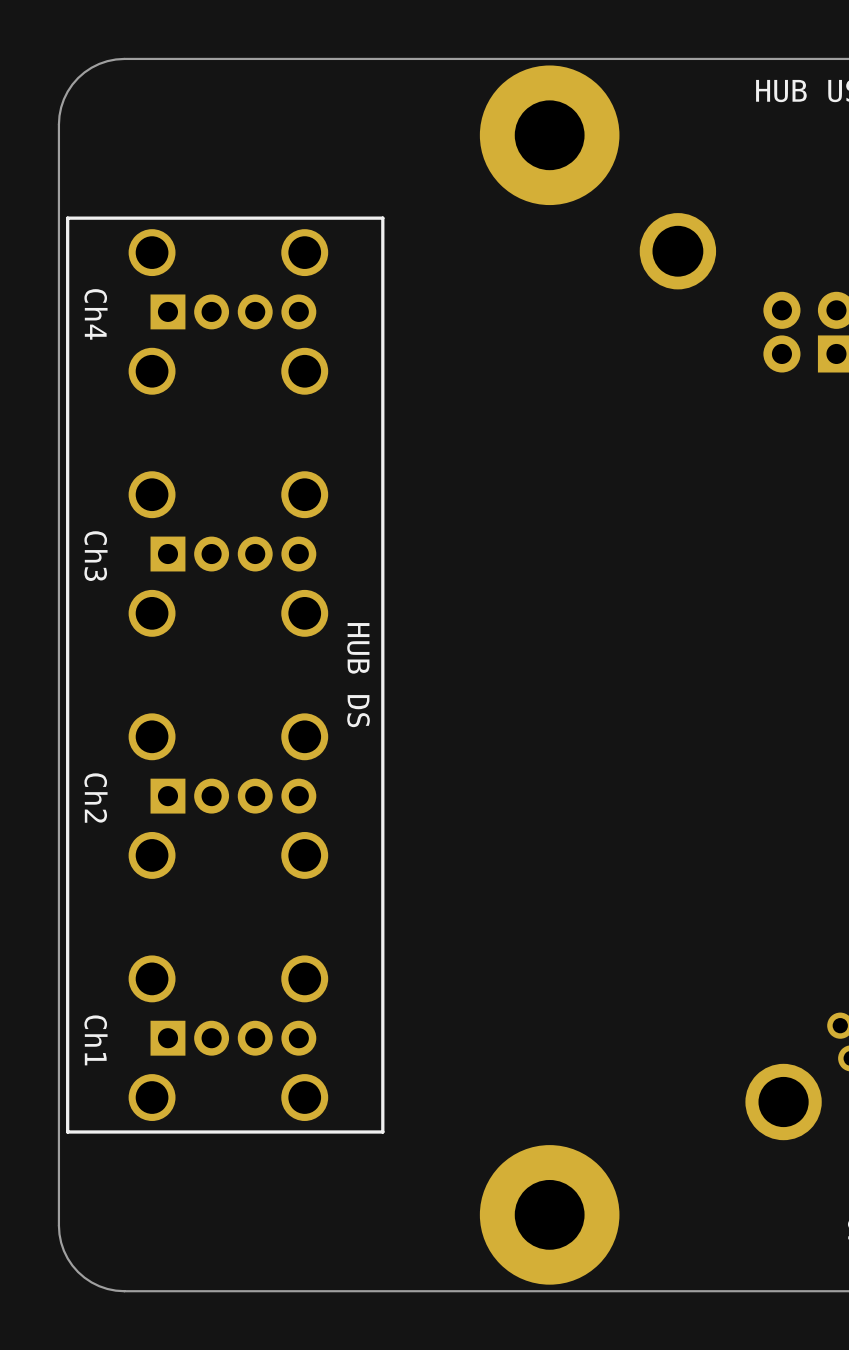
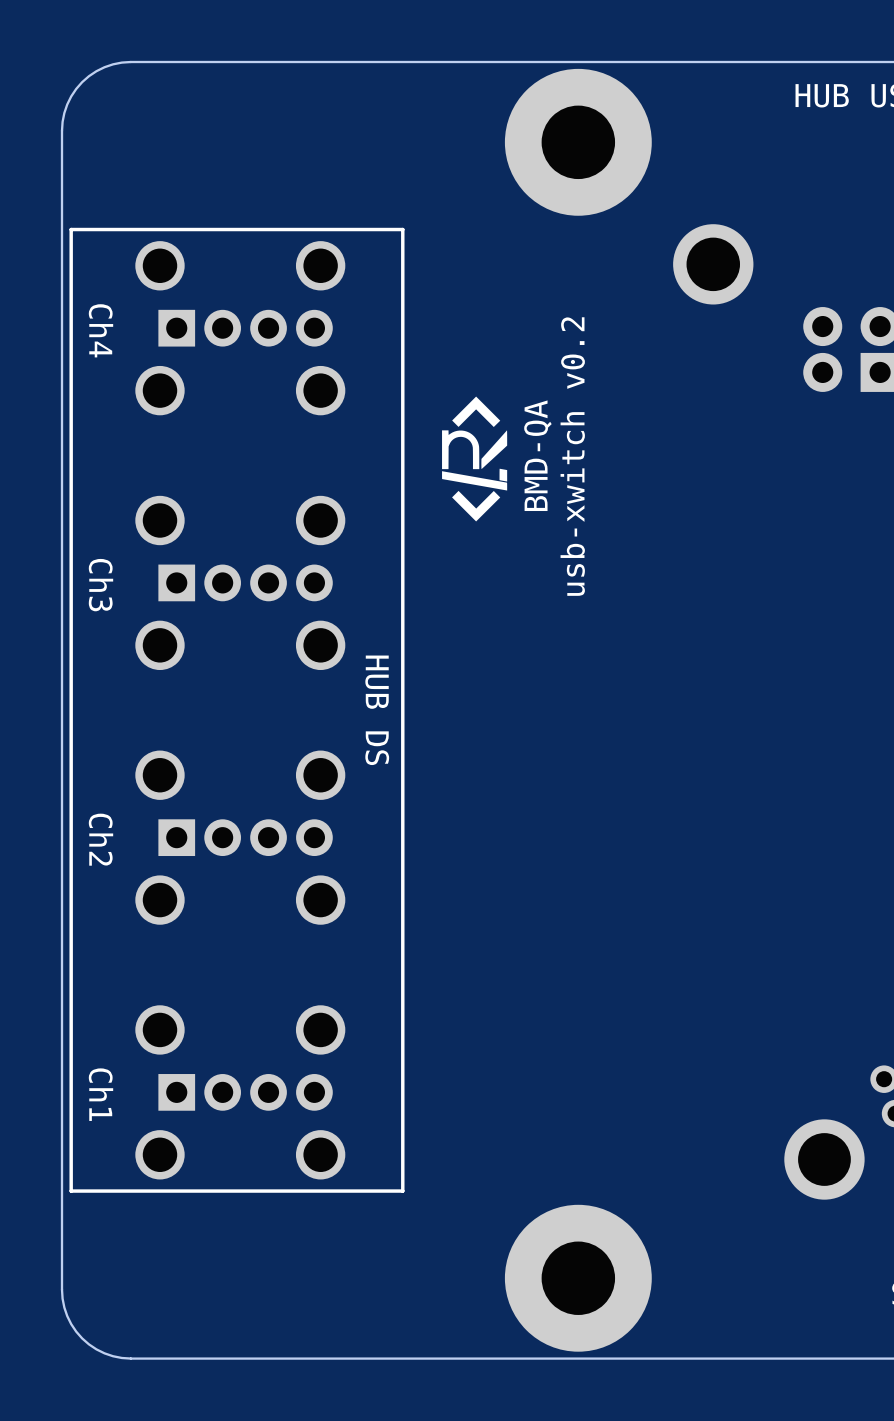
drawing: none -> [442, 396, 508, 522]
text: none -> BMD-QA (537, 455)
text: none -> usb-xwitch v0.2 (572, 456)

